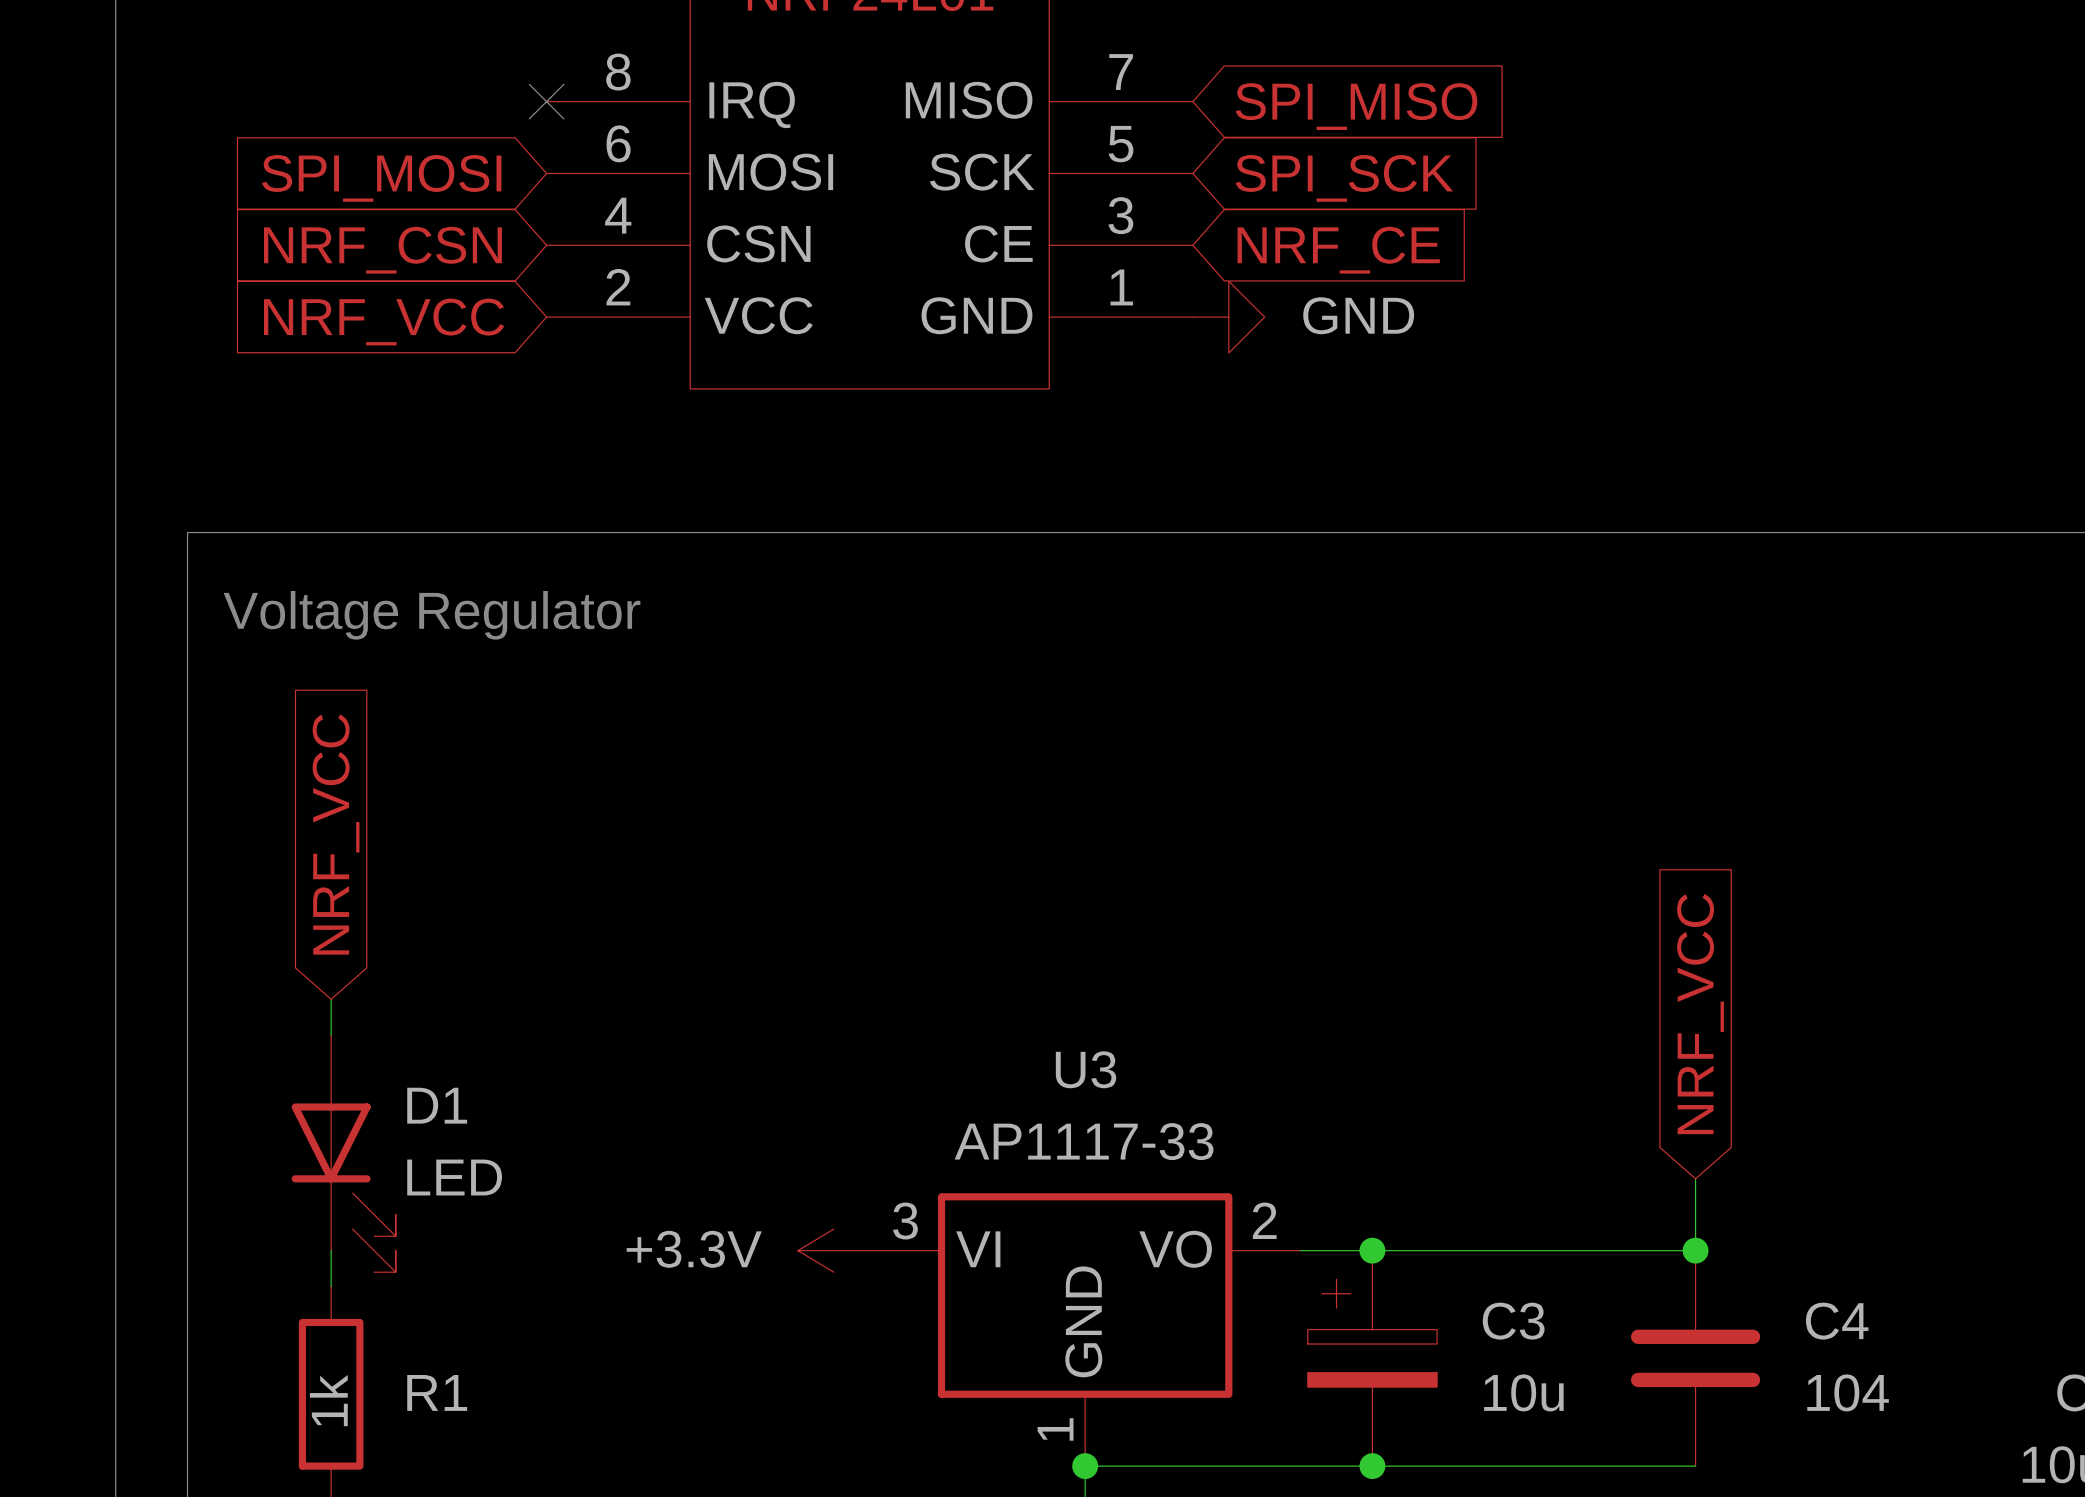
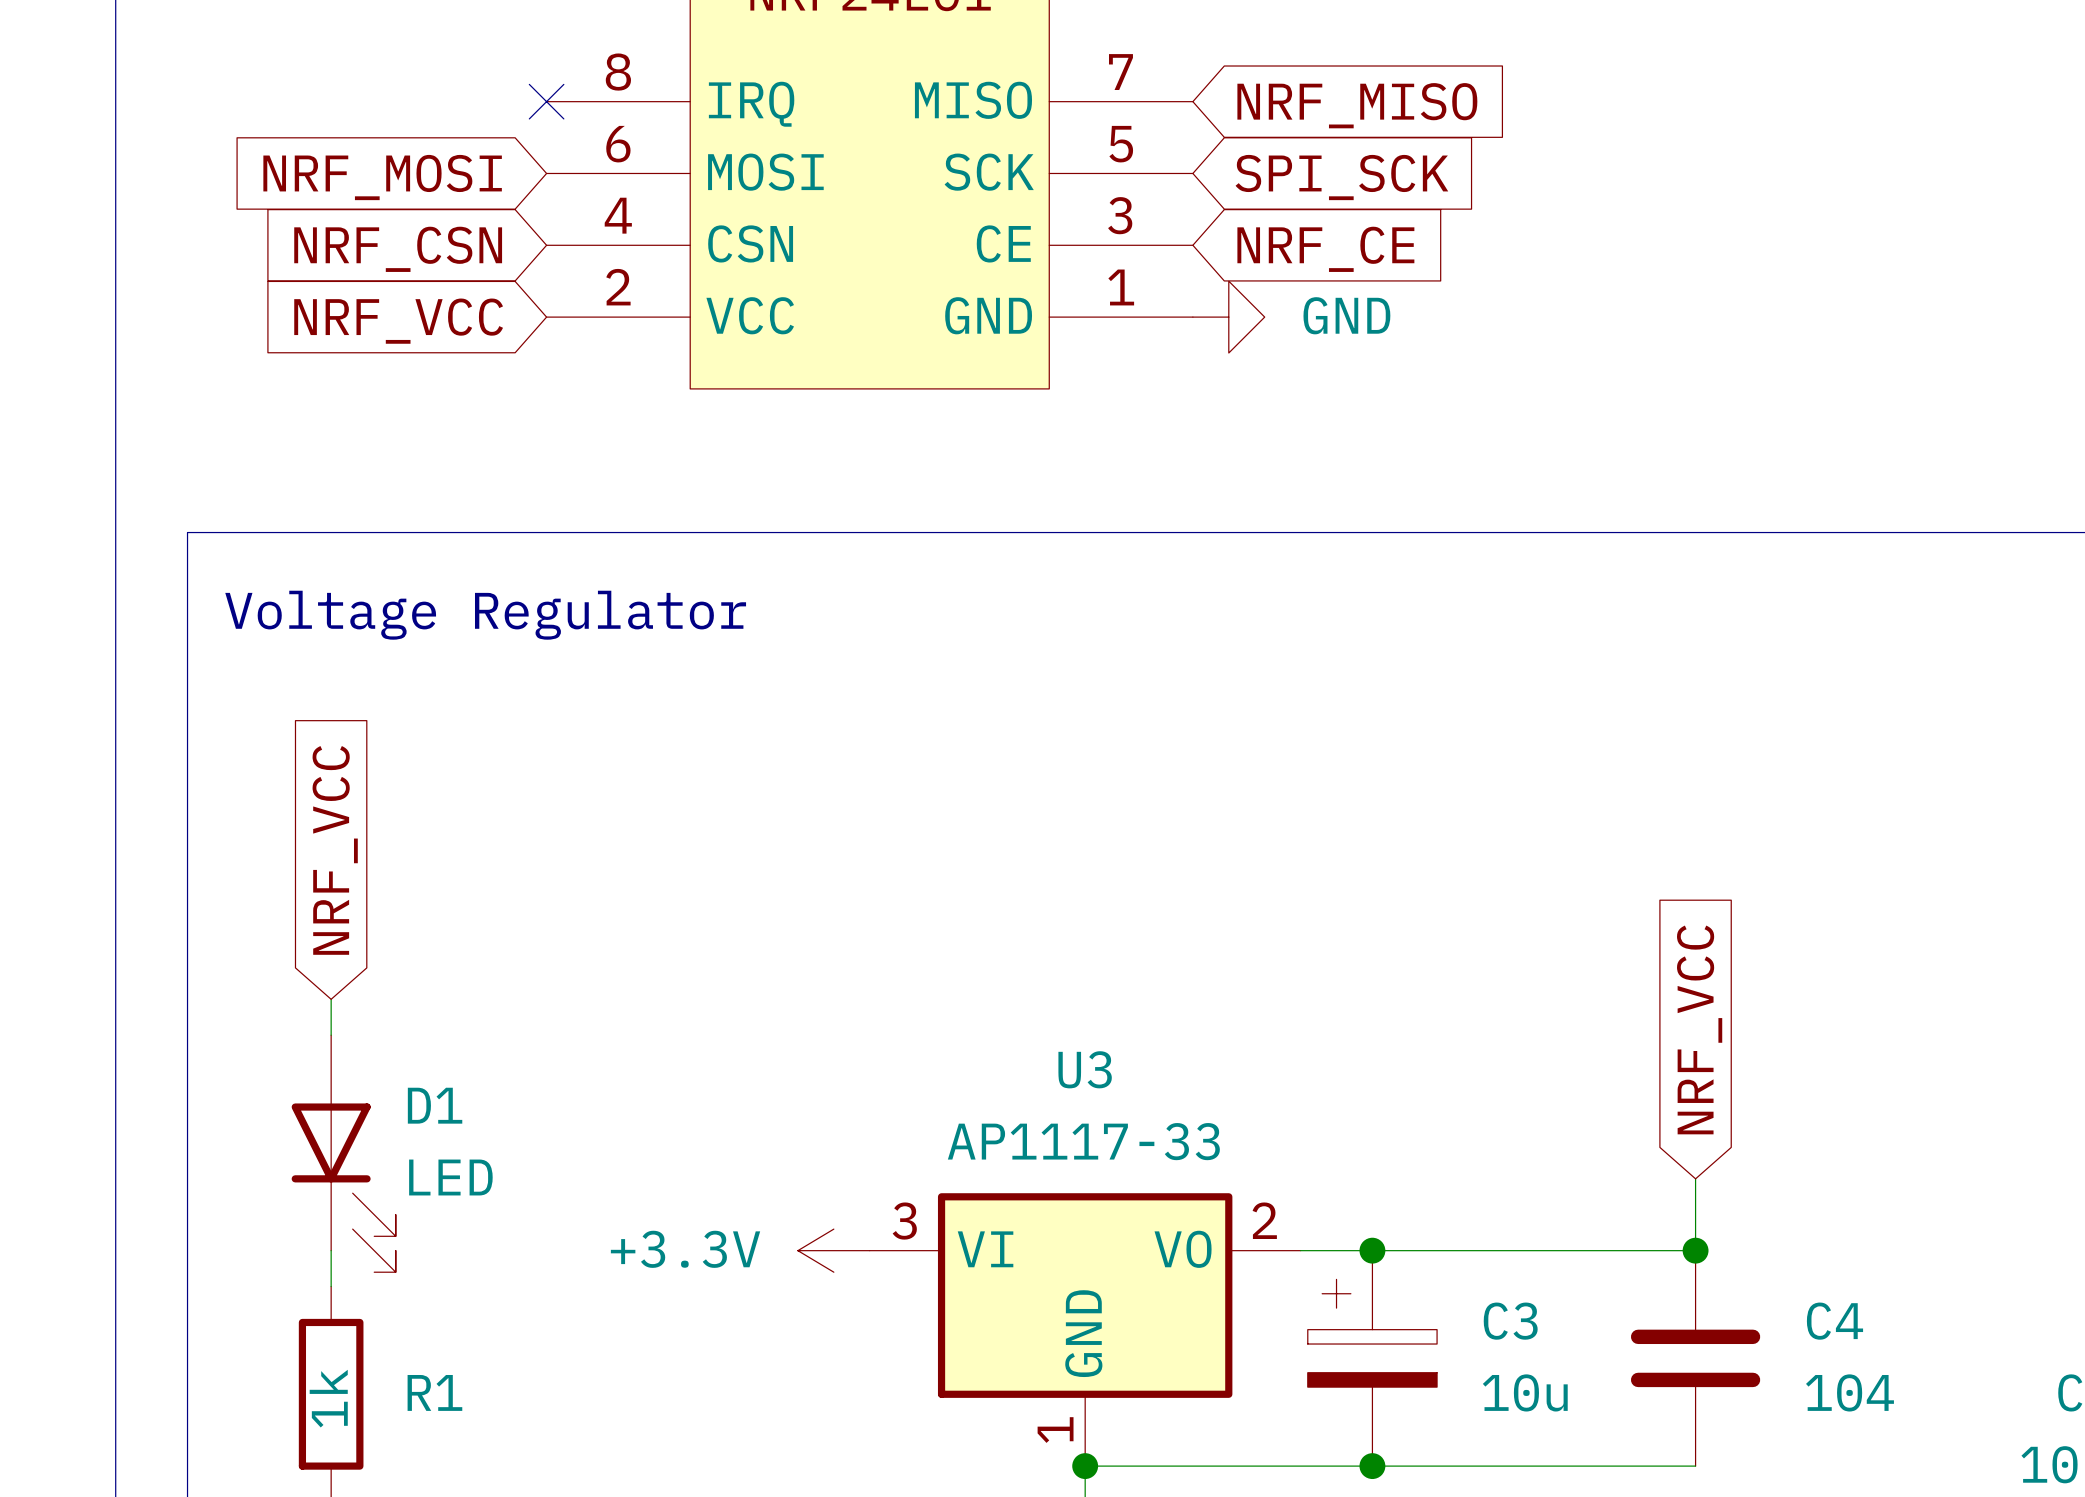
global label: SPI_MISO (1356, 106) -> NRF_MISO (1357, 105)
global label: SPI_MOSI (381, 178) -> NRF_MOSI (382, 177)

